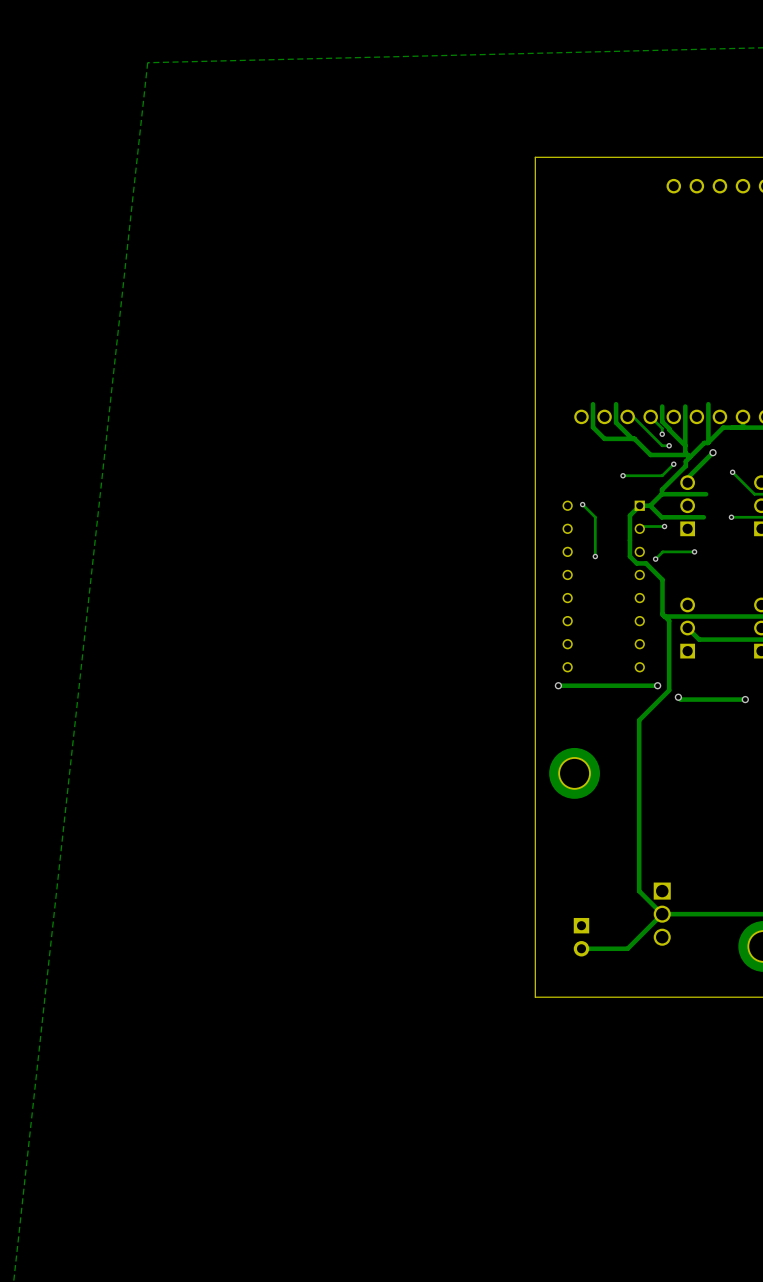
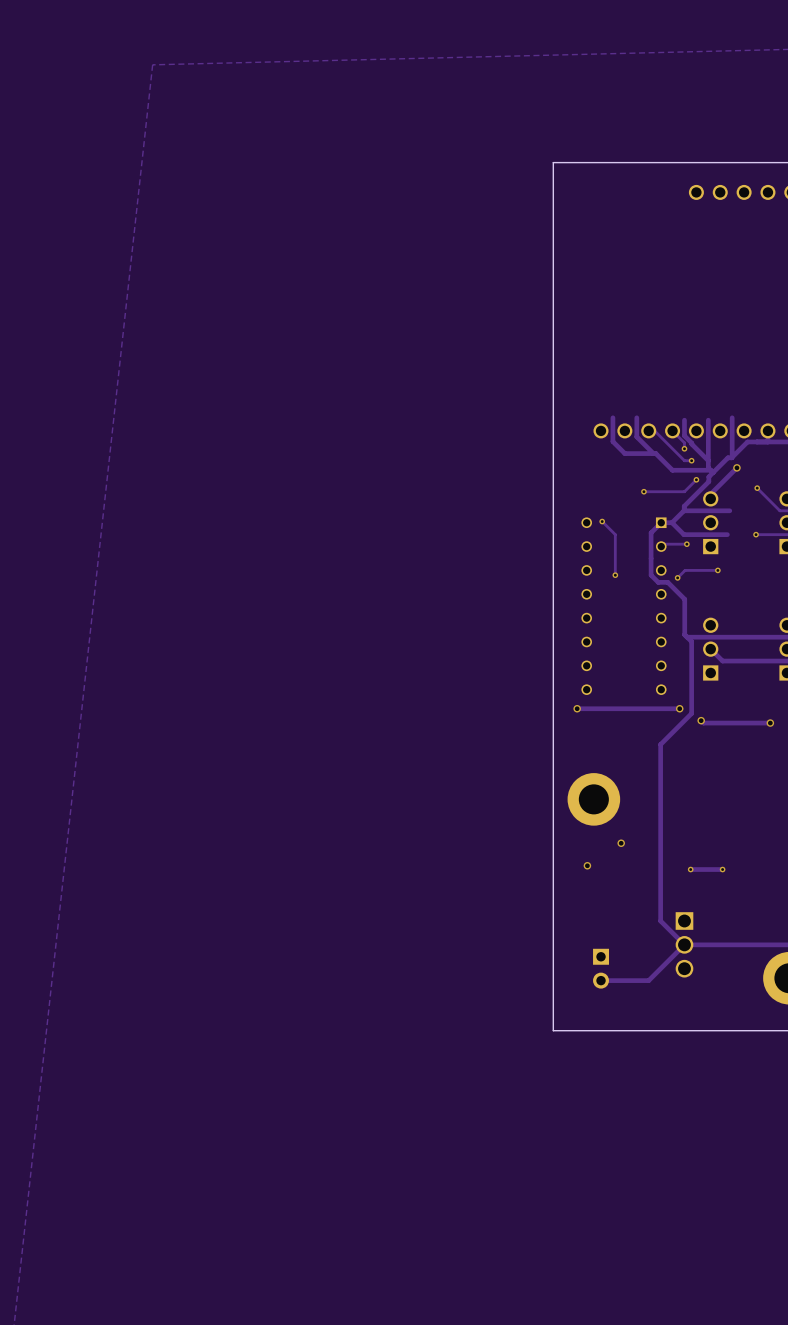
via: none -> (621, 843)
via: none -> (587, 865)
via: none -> (690, 869)
track: none -> (722, 869) (690, 869)
via: none -> (722, 869)

